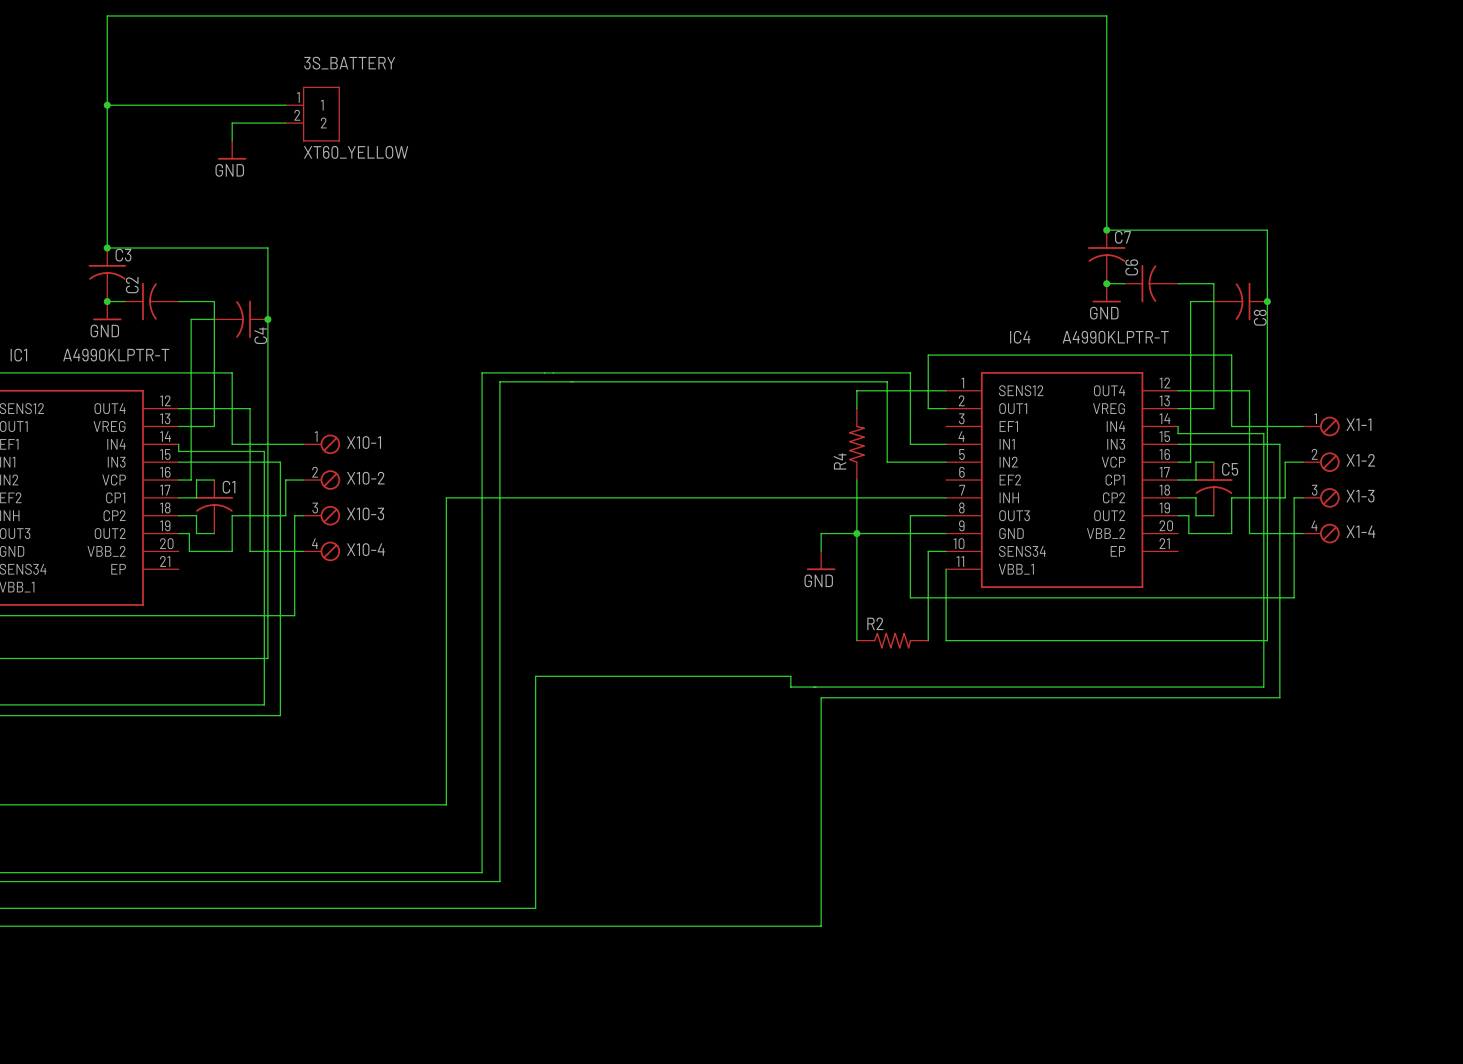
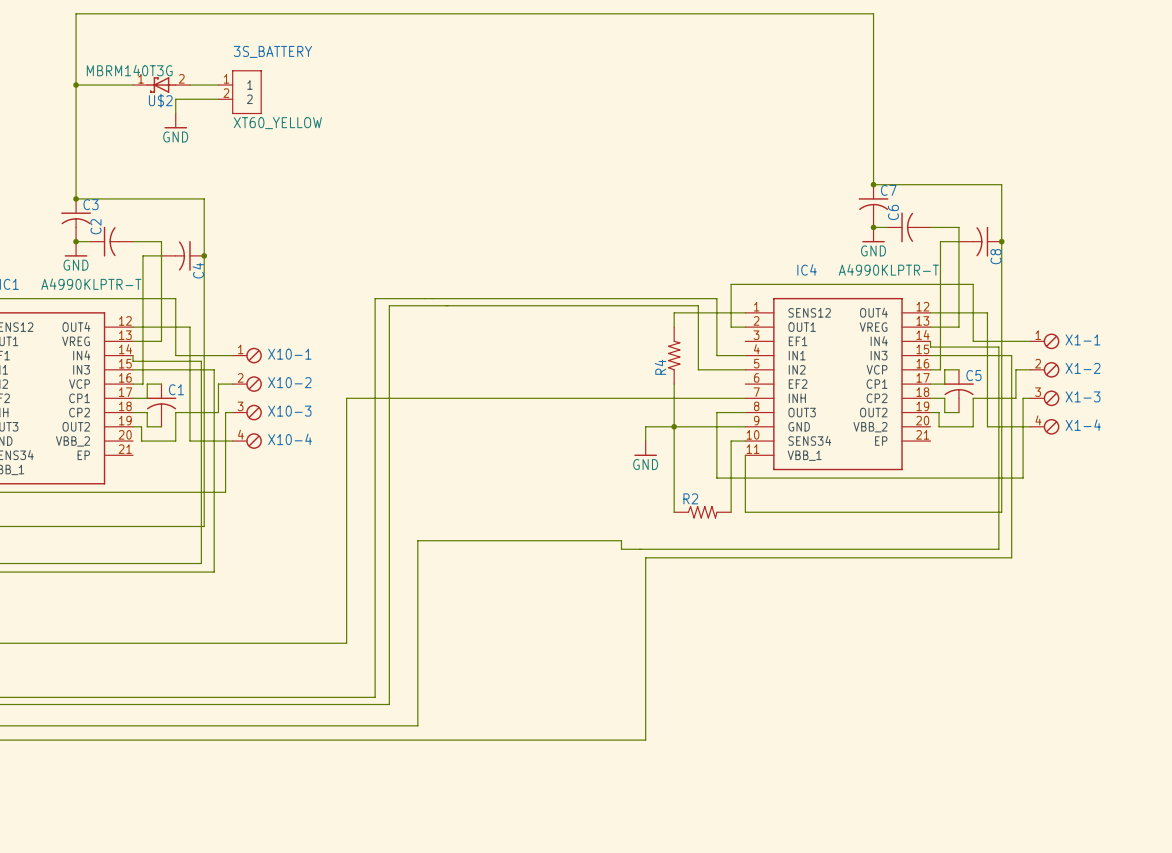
U$2: none -> MBRM140T3G (161, 85)

